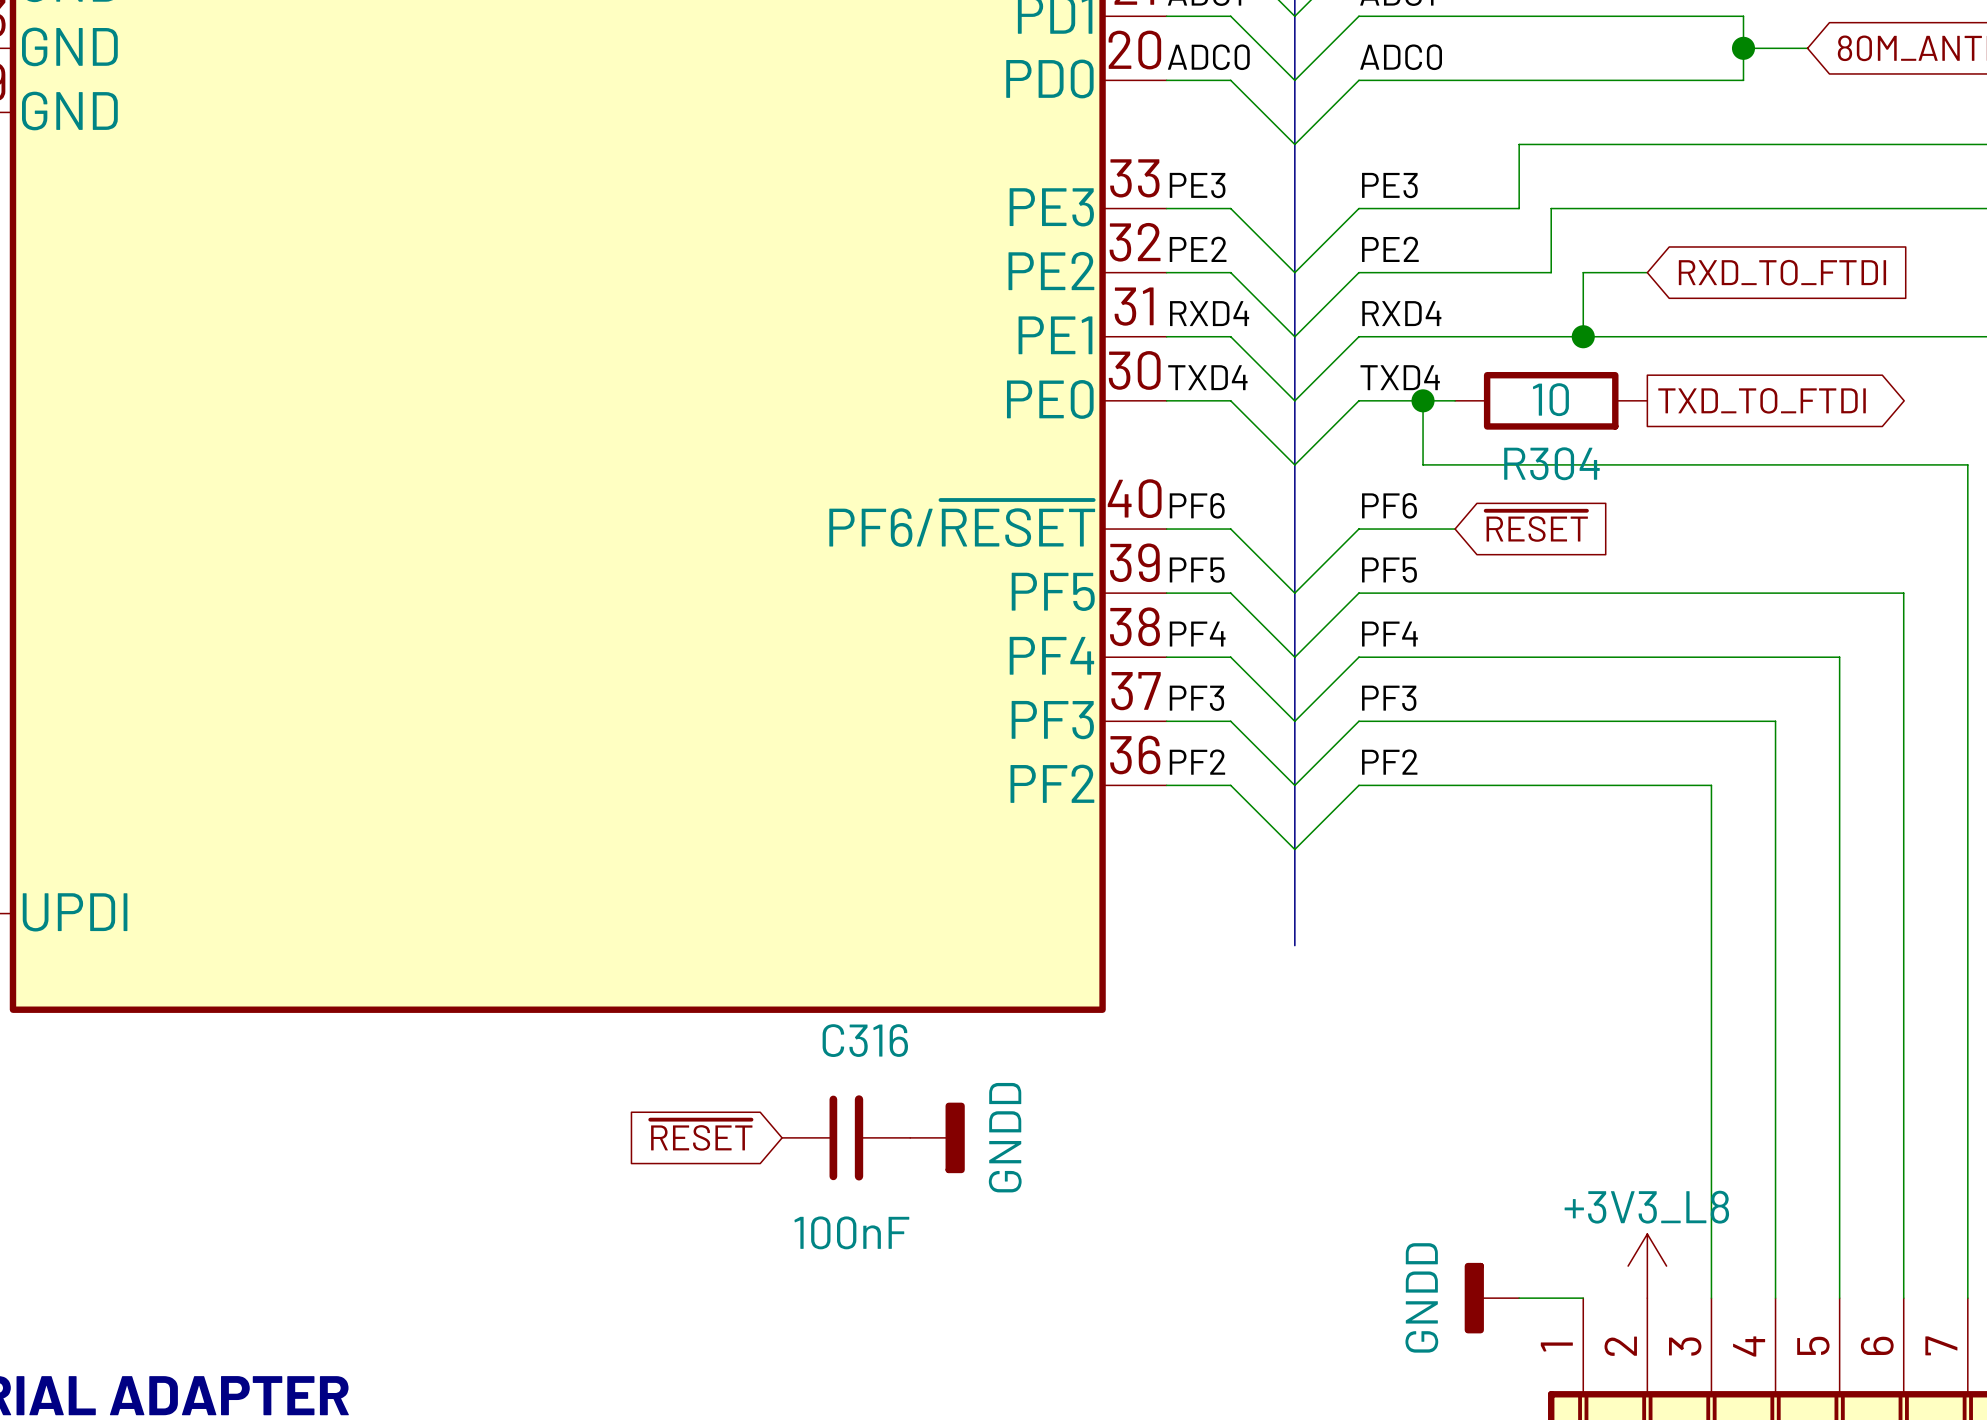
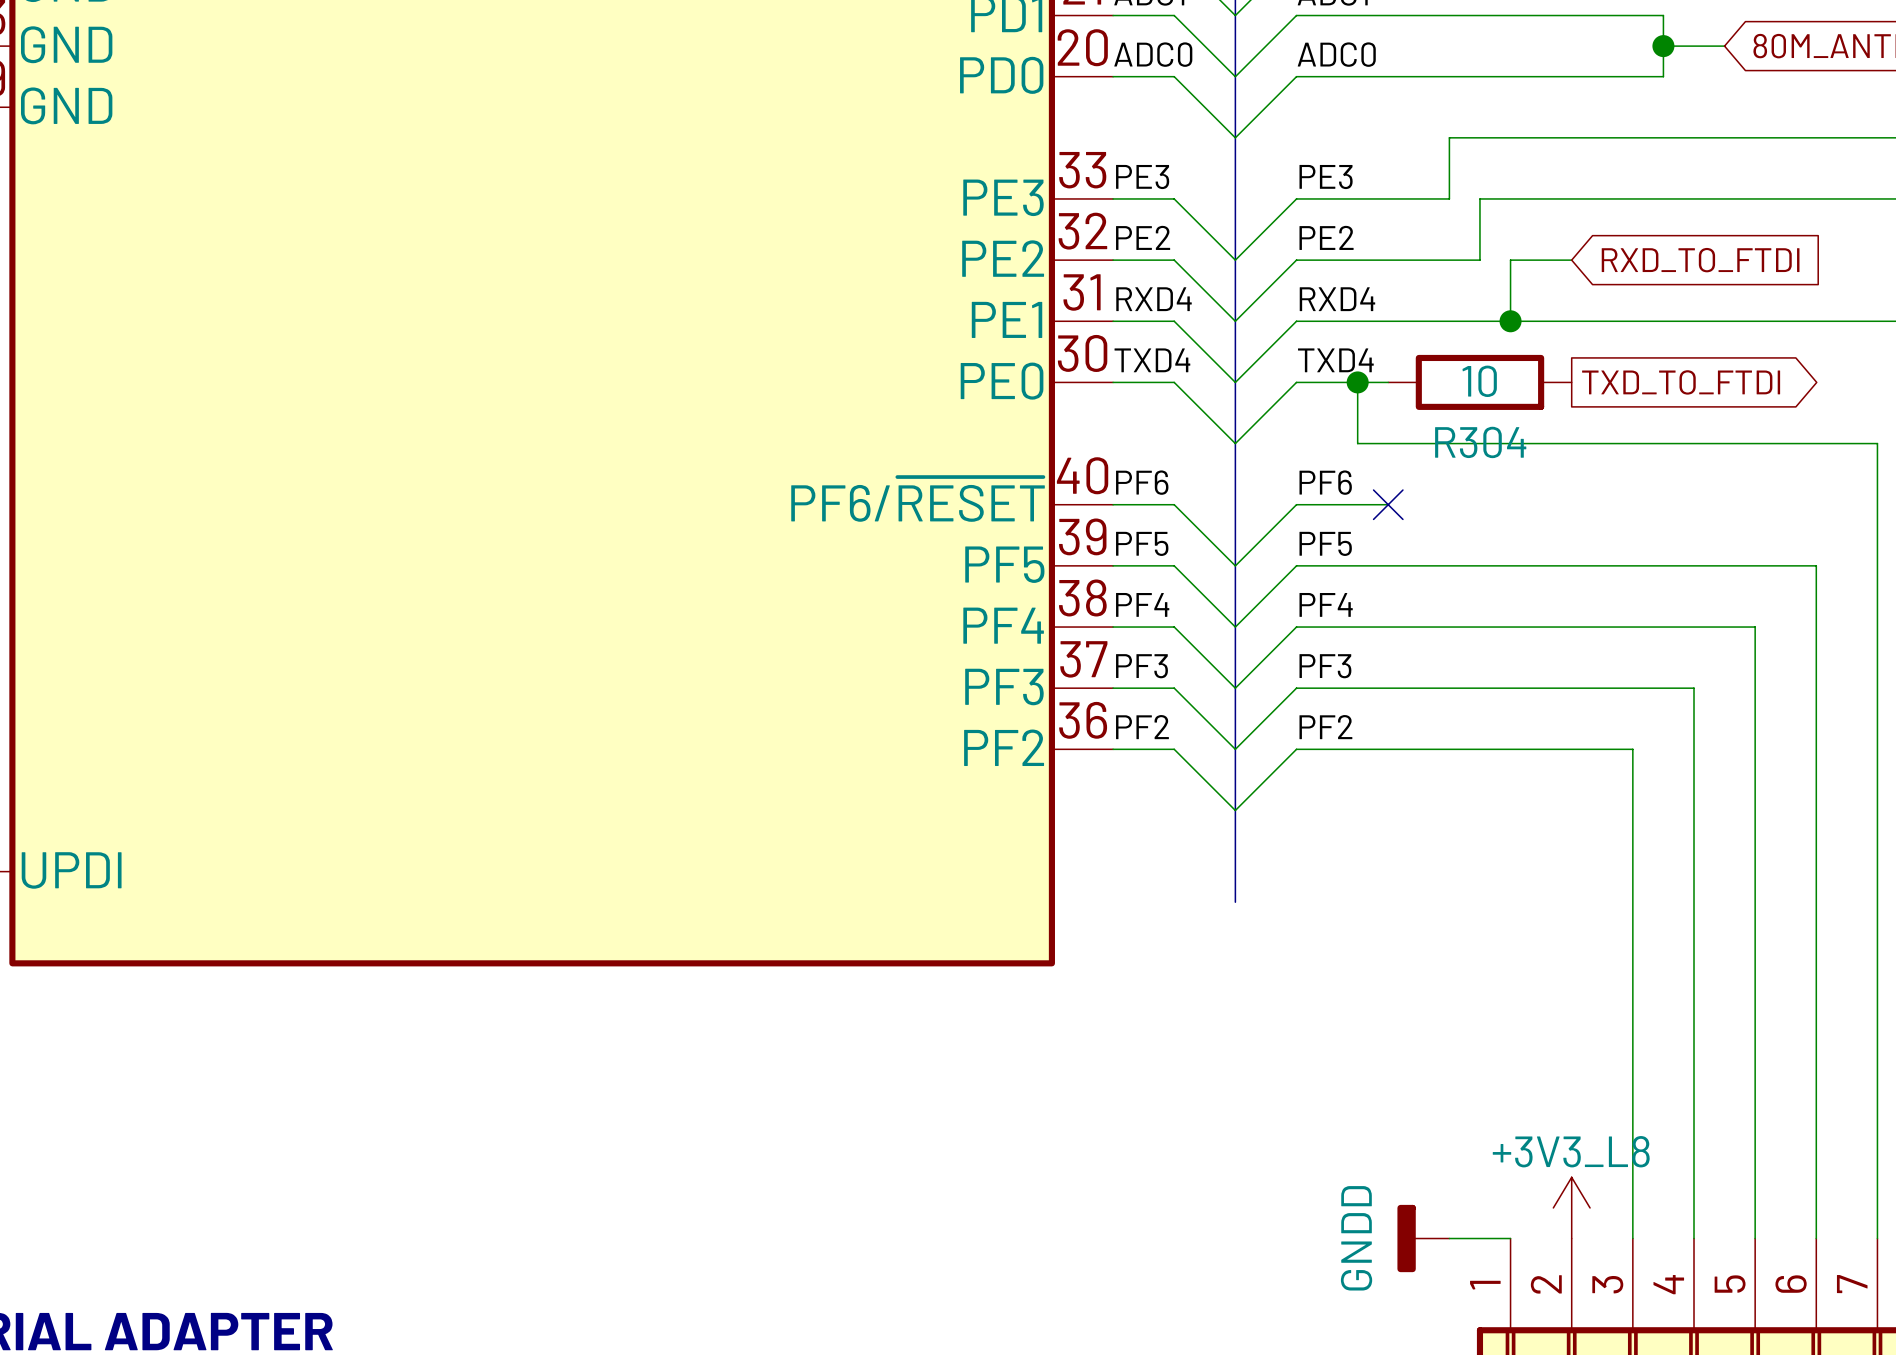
global label: ~{RESET} (1536, 526) -> none
no-connect mark: none -> (1388, 504)
global label: ~{RESET} (701, 1135) -> none
C316: 100nF (846, 1137) -> none
power symbol: GNDD (937, 1137) -> none

